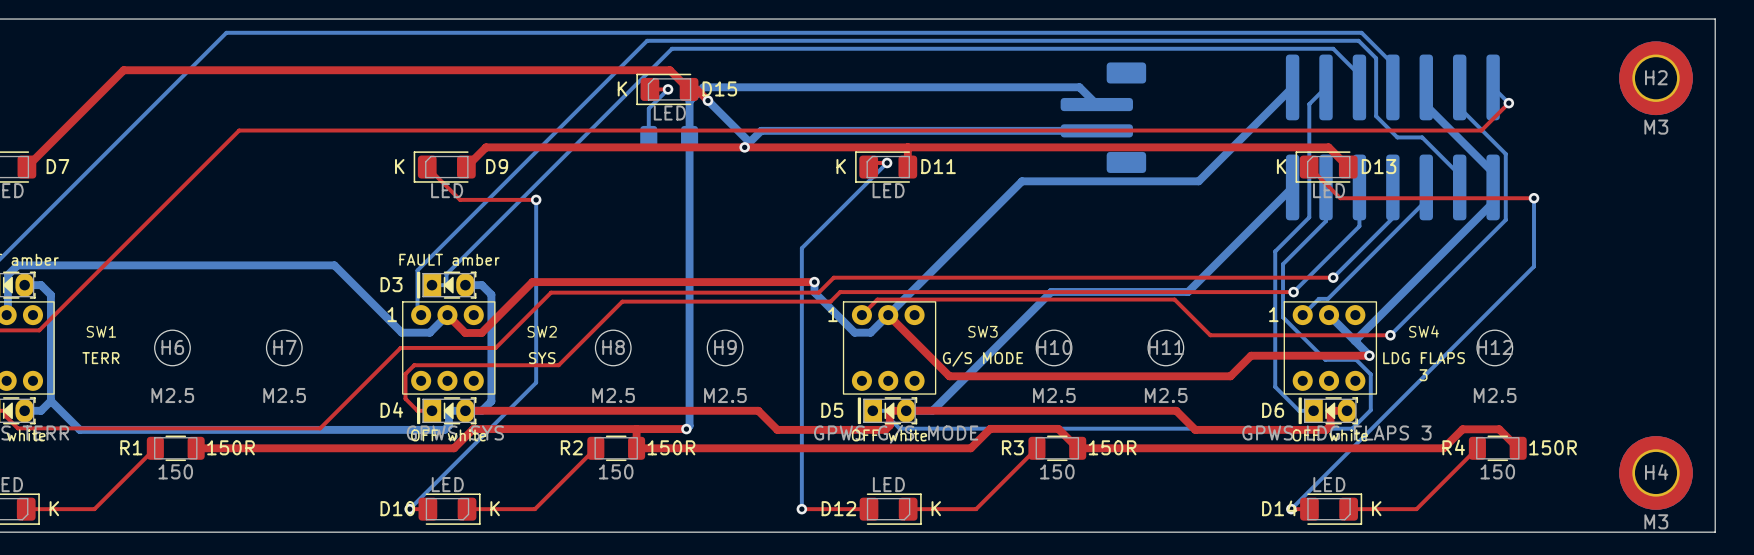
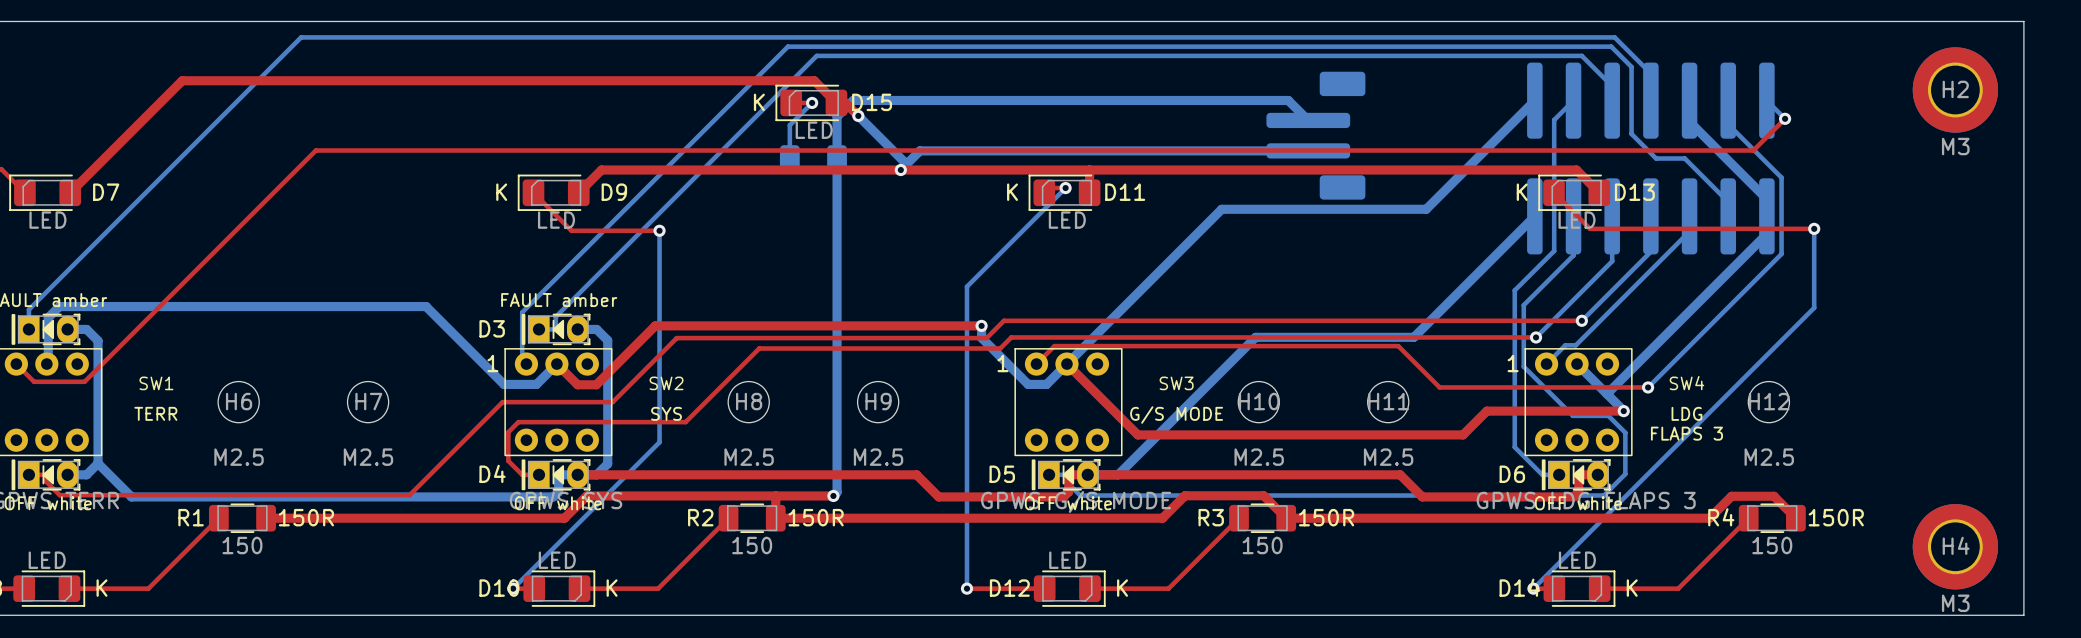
SW4 text: LDG FLAPS (1424, 358) -> LDG (1686, 413)
SW4 text: 3 (1423, 375) -> FLAPS 3 (1686, 433)

